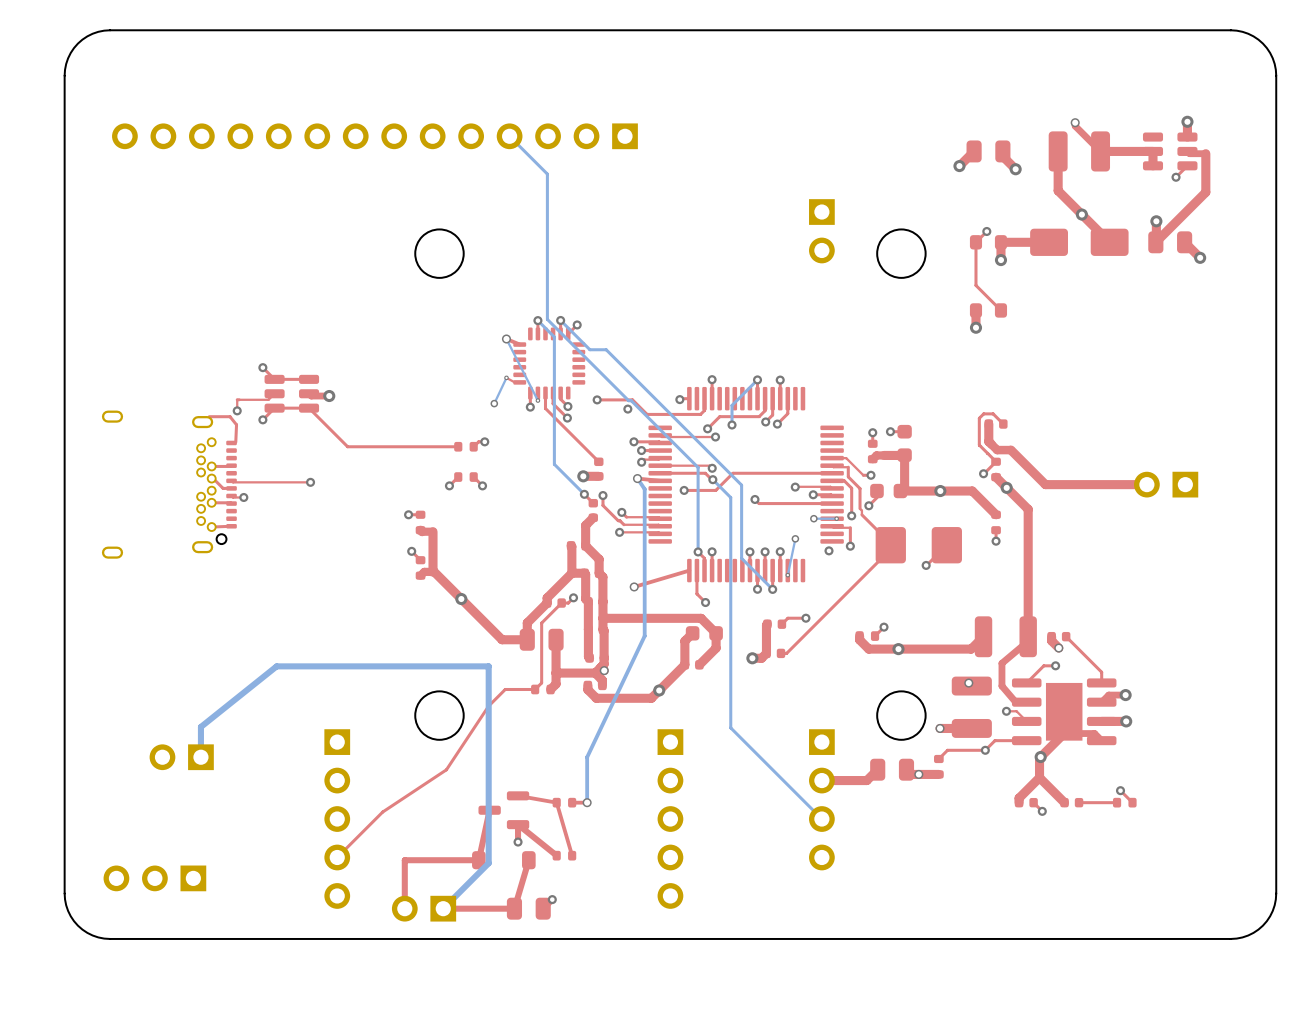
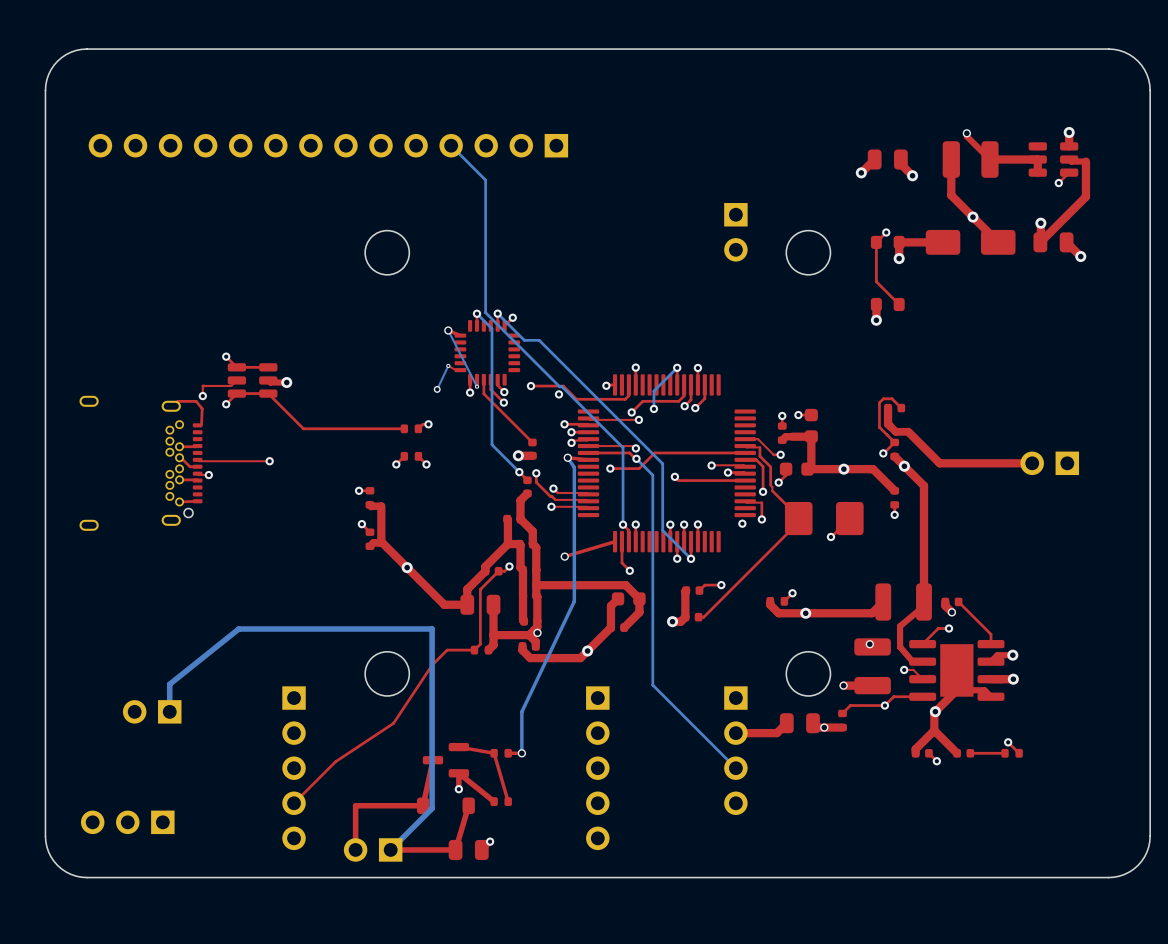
via: (813, 518) -> none
bottom track: (836, 518) (813, 518) -> none
via: (836, 518) -> none
bottom track: (795, 538) (787, 575) -> none
via: (795, 538) -> none
via: (787, 575) -> none

